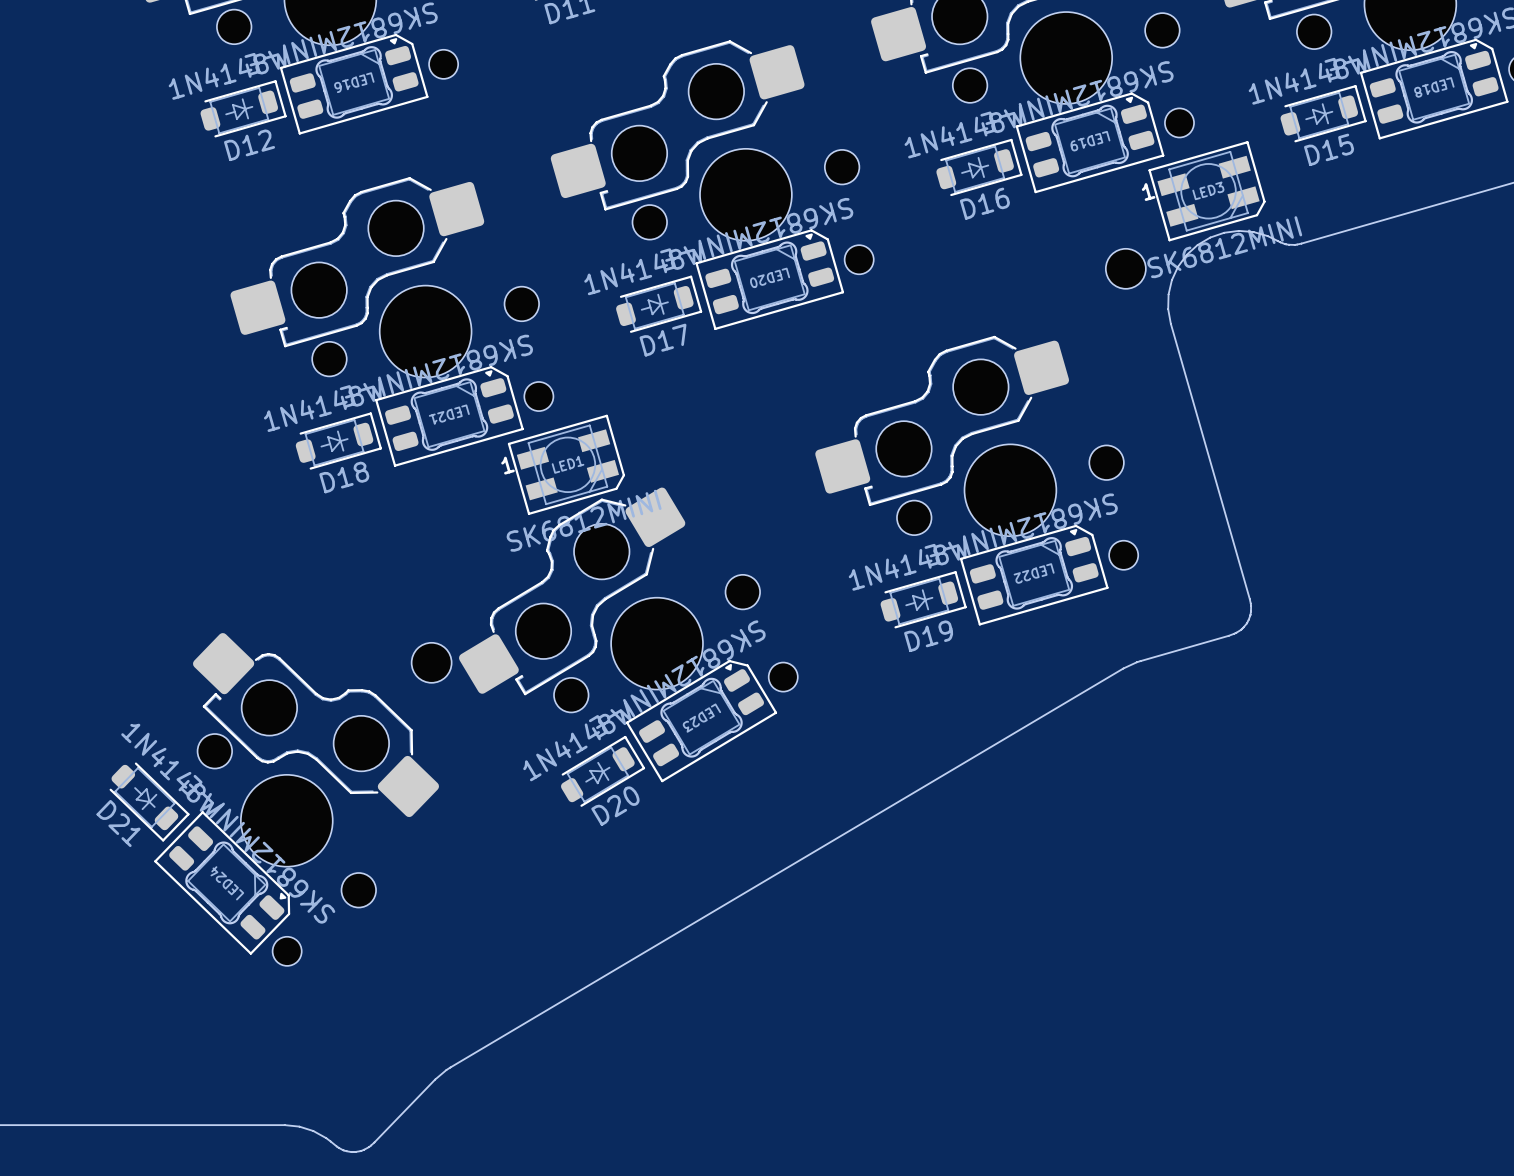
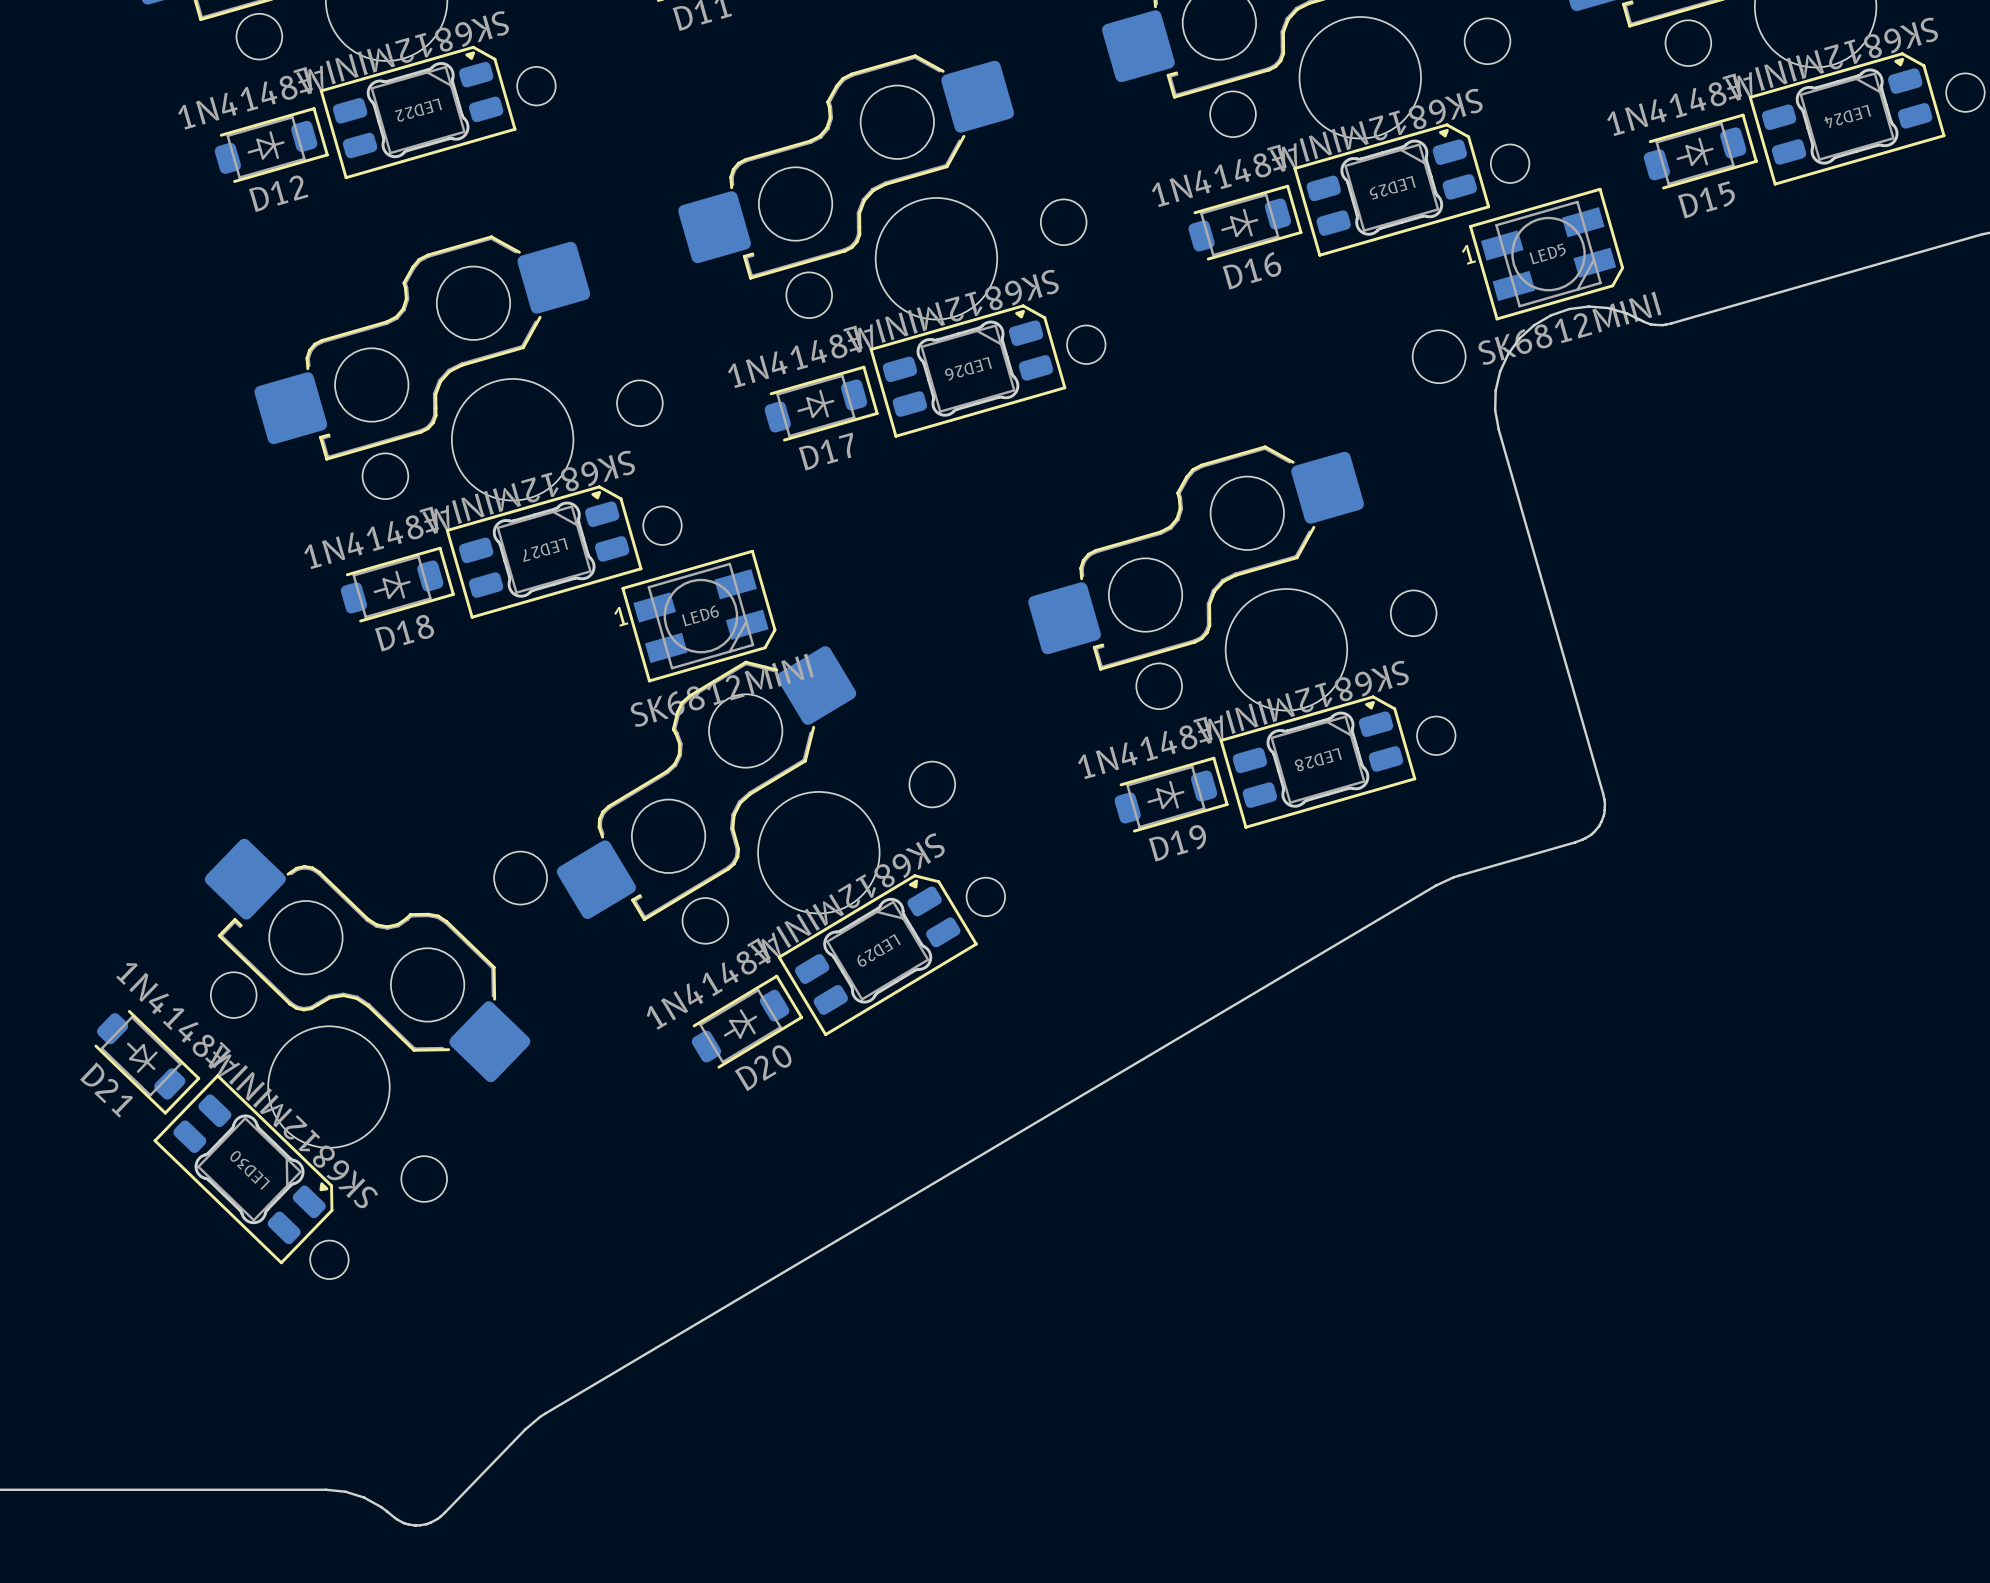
LED16 name: LED16 (354, 82) -> LED22 (418, 110)
LED18 name: LED18 (1434, 87) -> LED24 (1847, 116)
LED19 name: LED19 (1090, 141) -> LED25 (1392, 187)
LED3 name: LED3 (1208, 190) -> LED5 (1547, 253)
LED20 name: LED20 (770, 277) -> LED26 (968, 368)
LED21 name: LED21 (449, 414) -> LED27 (545, 549)
LED1 name: LED1 (568, 464) -> LED6 (700, 615)
LED22 name: LED22 (1034, 573) -> LED28 (1318, 759)
LED23 name: LED23 (701, 718) -> LED29 (879, 950)
LED24 name: LED24 (227, 883) -> LED30 (250, 1170)

